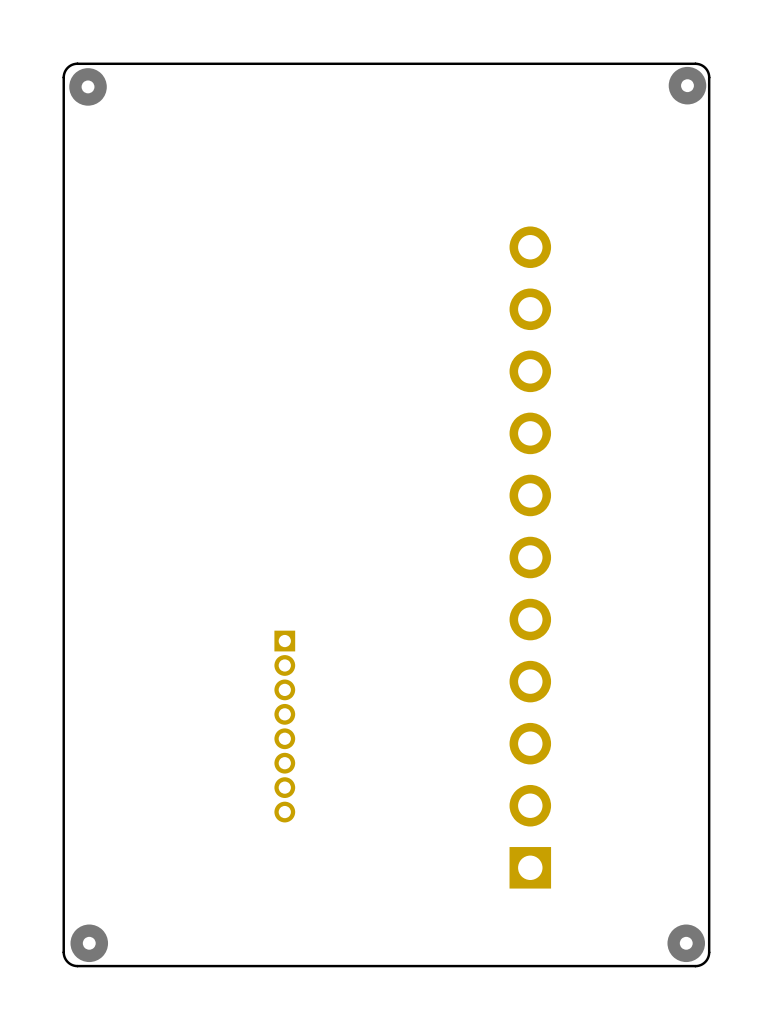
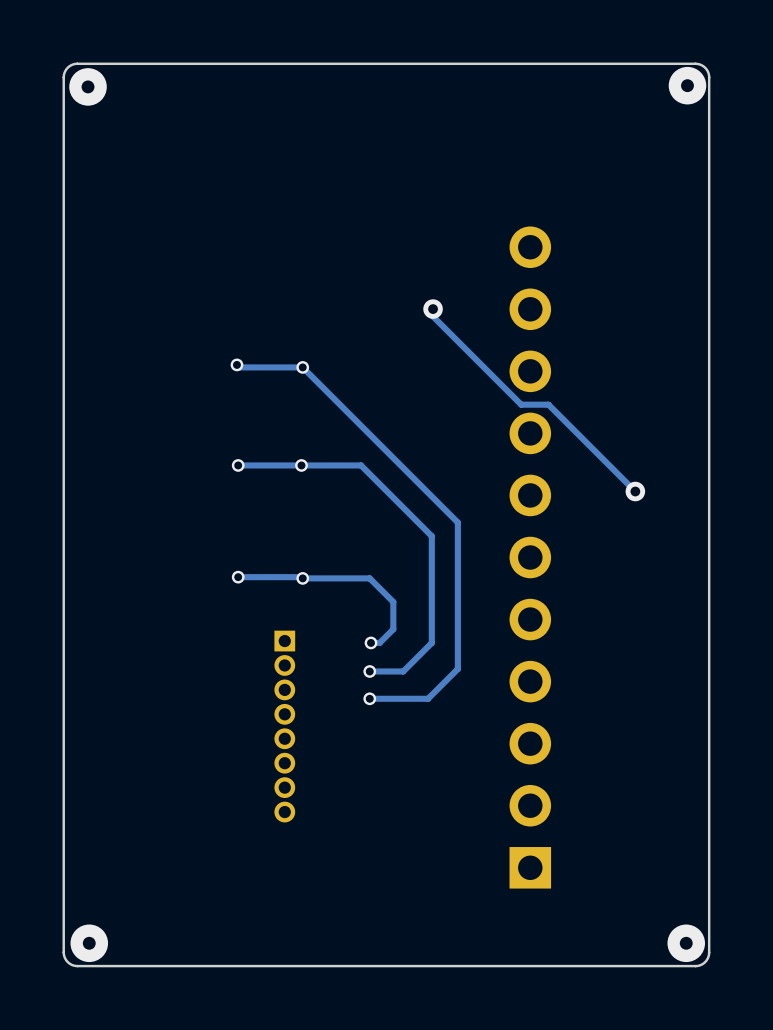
track: none -> (433, 309) (433, 316) (521, 404) (548, 404) (635, 491)
via: none -> (433, 309)
track: none -> (236, 364) (239, 367) (302, 367) (457, 522) (457, 668) (428, 698) (369, 698)
via: none -> (236, 364)
via: none -> (302, 367)
track: none -> (238, 465) (361, 465) (431, 536) (431, 642) (403, 671) (369, 671)
via: none -> (238, 465)
via: none -> (301, 465)
via: none -> (635, 491)
track: none -> (238, 577) (369, 578) (393, 601) (393, 629) (379, 642) (371, 642)
via: none -> (238, 577)
via: none -> (302, 578)
via: none -> (371, 642)
via: none -> (369, 671)
via: none -> (369, 698)

